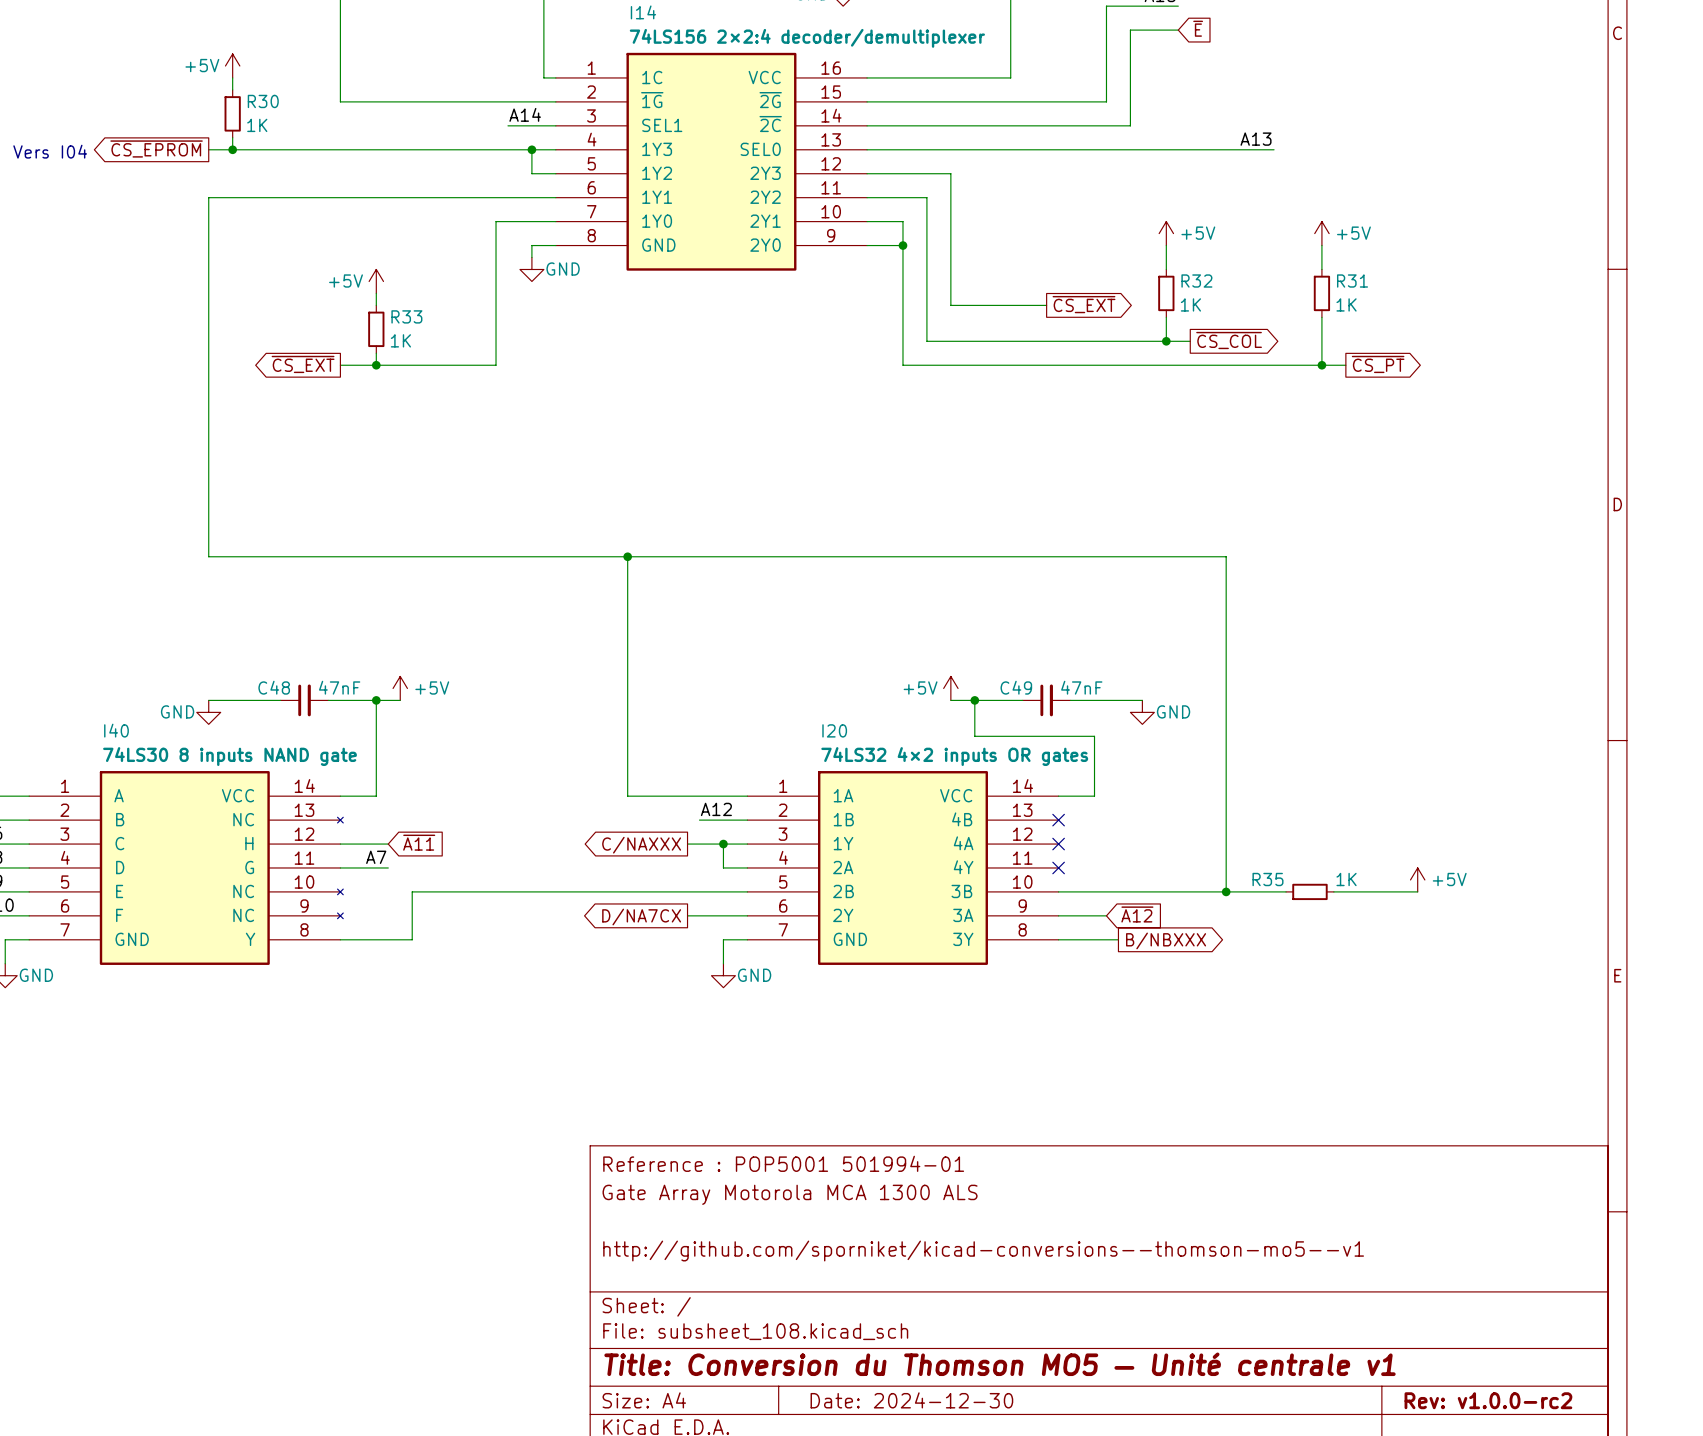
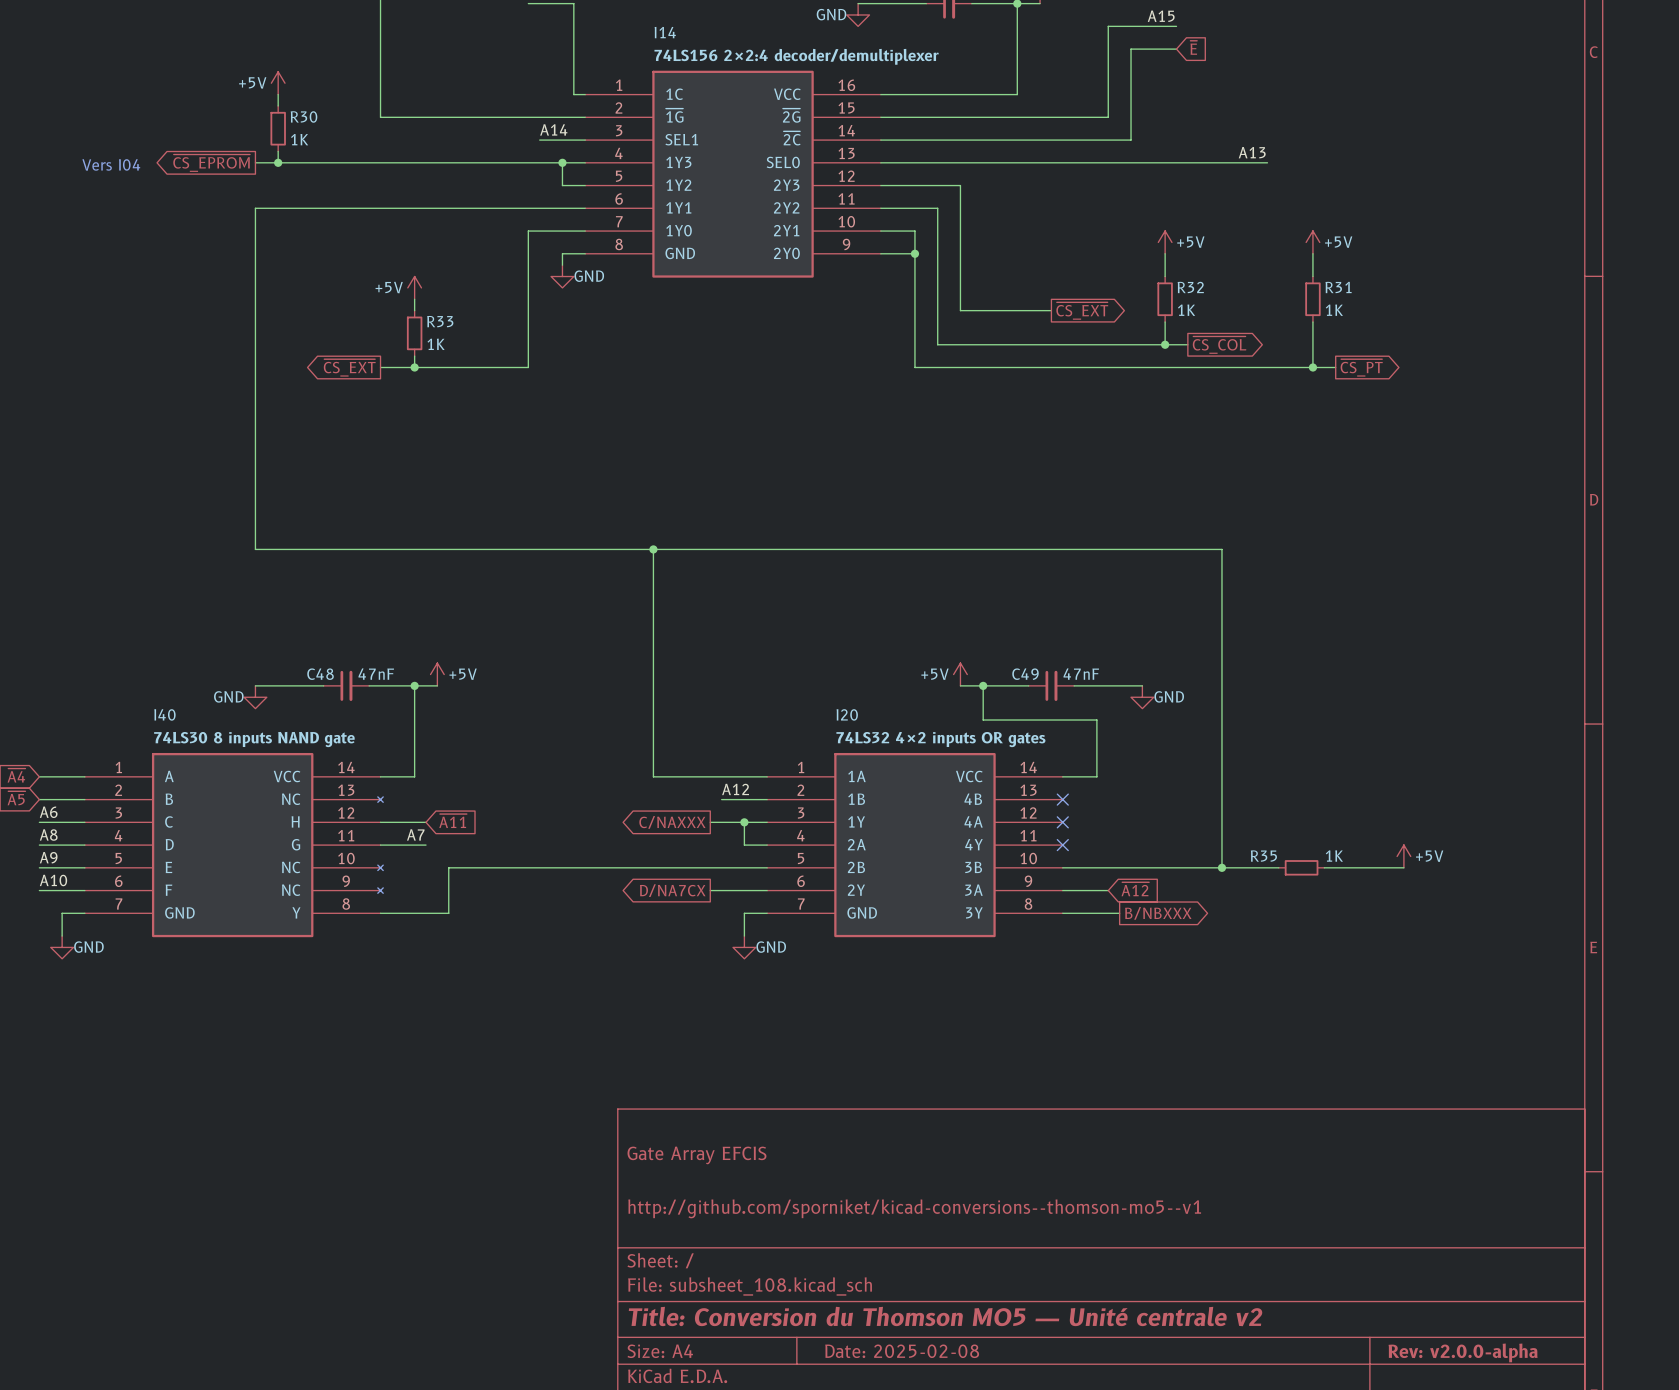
title block: Reference : POP5001 501994-01 (783, 1163) -> none
title block: Gate Array Motorola MCA 1300 ALS (790, 1194) -> Gate Array EFCIS (696, 1155)
title block: Title: Conversion du Thomson MO5 — Unité centrale v1 (1000, 1364) -> Title: Conversion du Thomson MO5 — Unité centrale v2 (945, 1316)
title block: Date: 2024-12-30 (911, 1400) -> Date: 2025-02-08 (902, 1351)
title block: Rev: v1.0.0-rc2 (1488, 1400) -> Rev: v2.0.0-alpha (1463, 1352)

